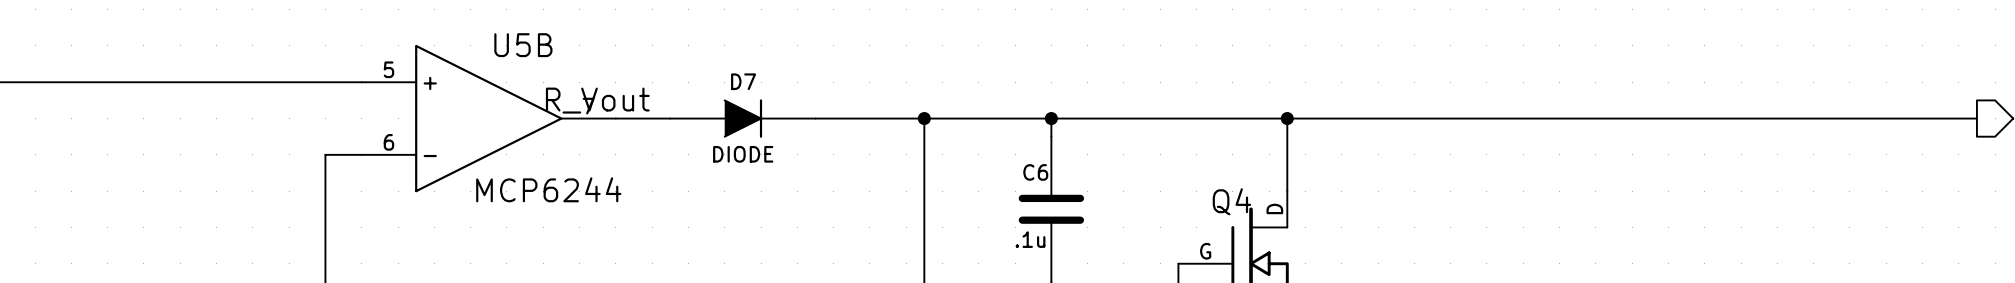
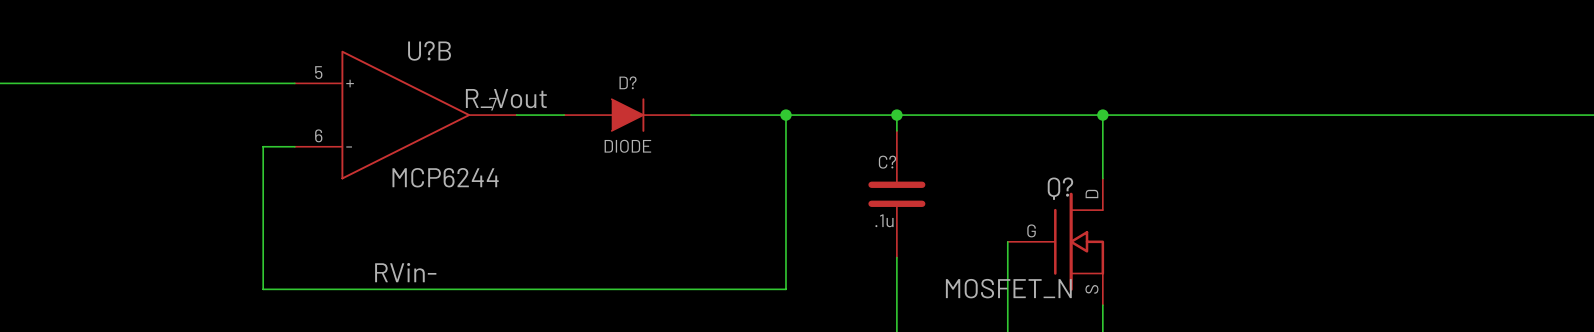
U5B name: U5B (523, 45) -> U?B (429, 50)
D7 name: D7 (743, 81) -> D? (628, 82)
C6 name: C6 (1035, 172) -> C? (887, 162)
Q4 name: Q4 (1231, 201) -> Q? (1060, 188)

